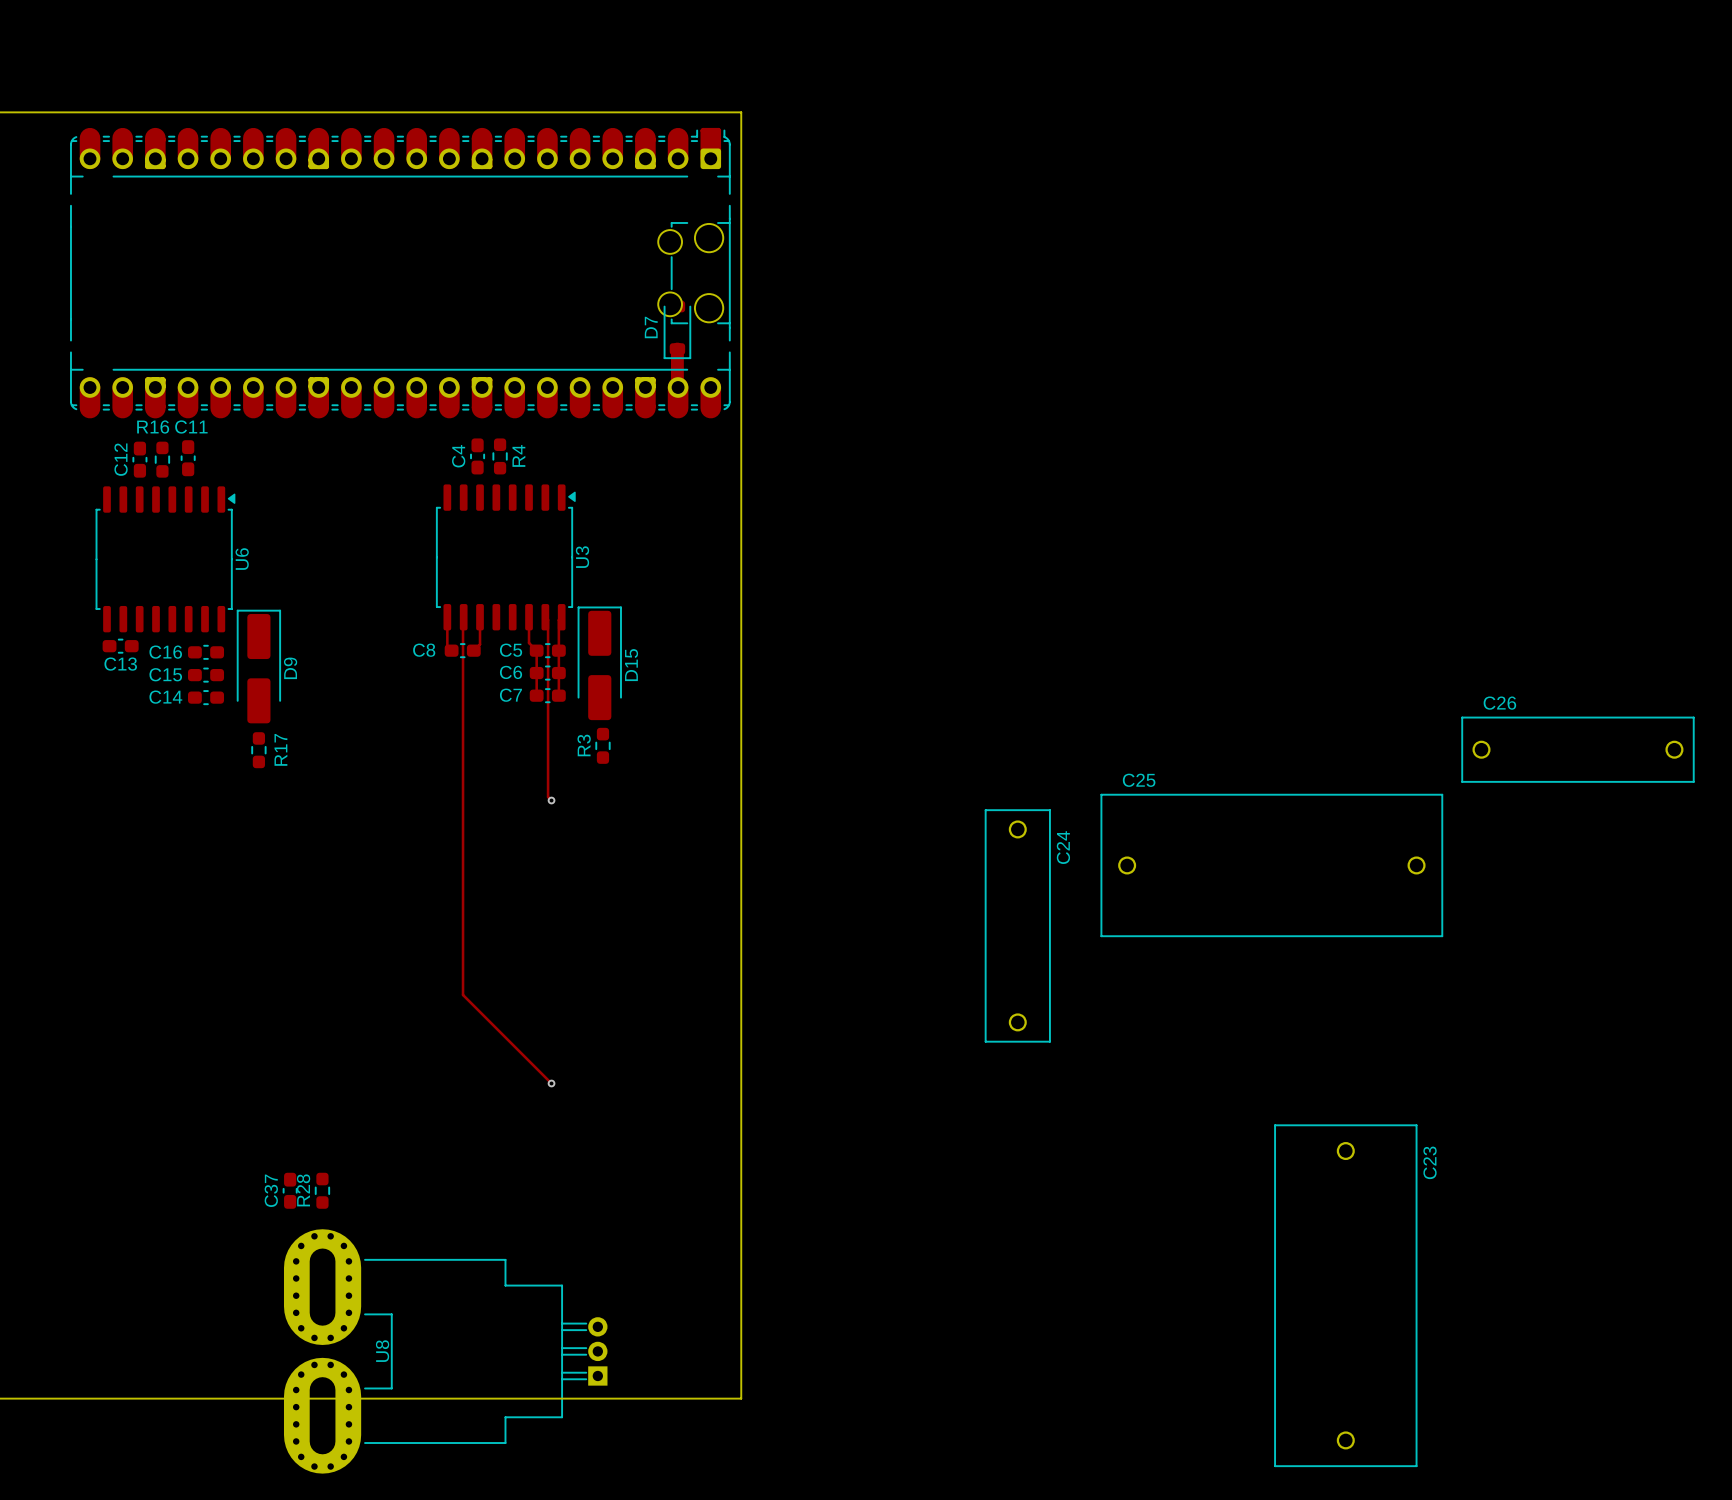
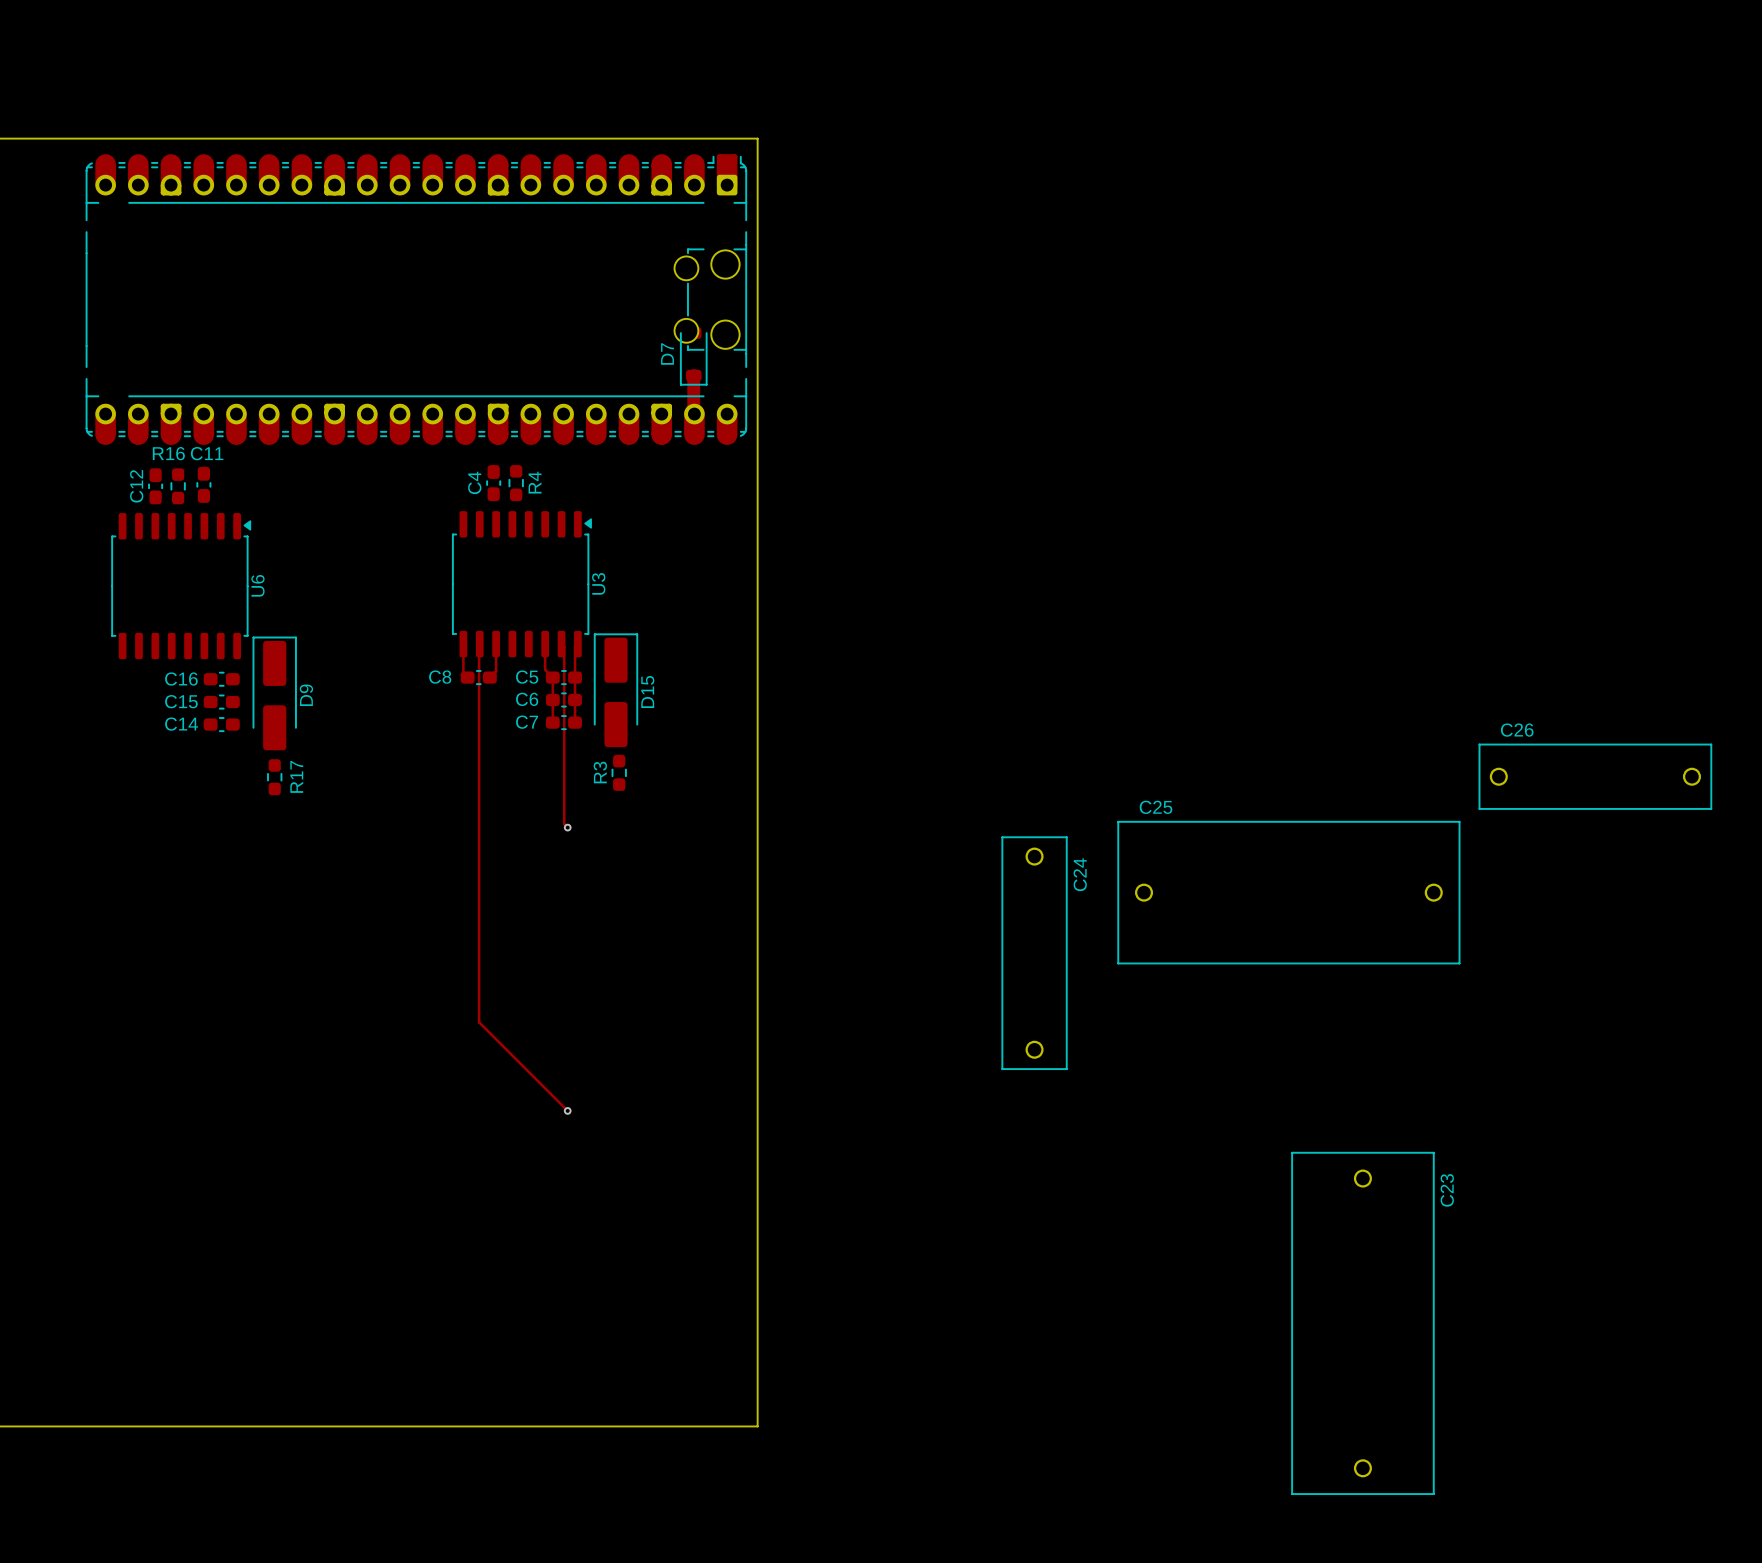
C13: (120, 646) -> none
C37: (290, 1190) -> none
R28: (322, 1190) -> none
U8: (445, 1351) -> none

